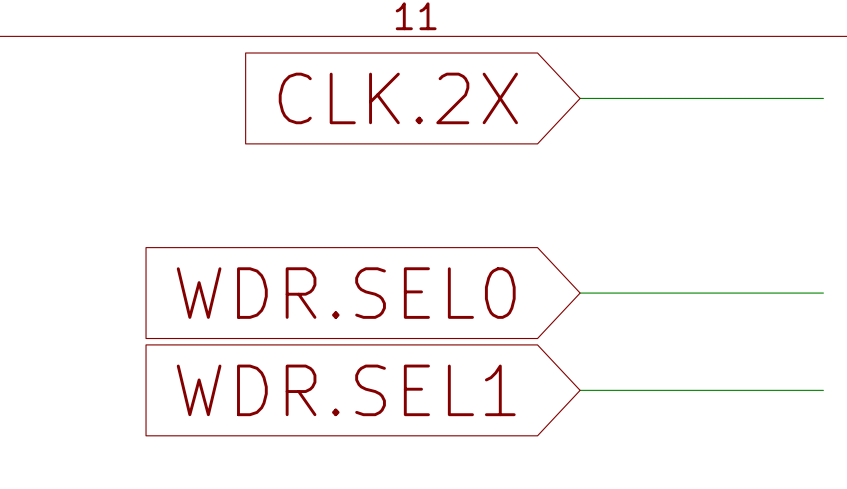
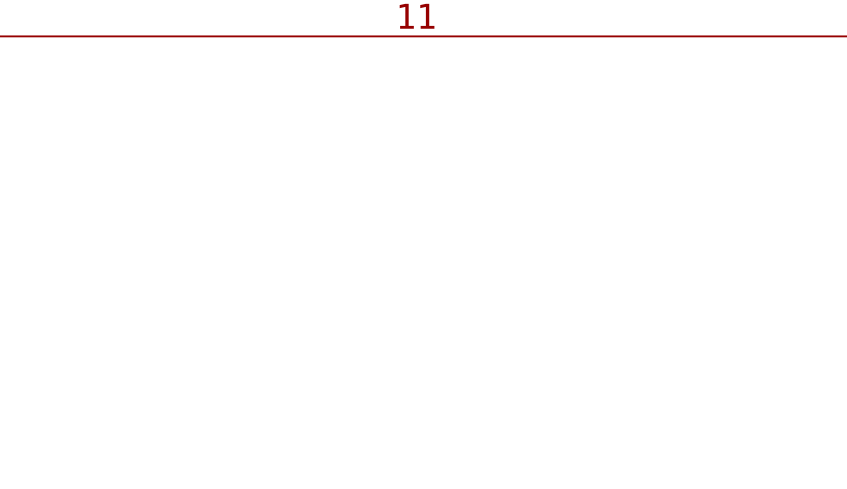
global label: CLK.2X (398, 98) -> none
wire: (580, 98) (823, 98) -> none
global label: WDR.SEL0 (346, 293) -> none
wire: (580, 293) (823, 293) -> none
global label: WDR.SEL1 (346, 390) -> none
wire: (580, 390) (823, 390) -> none

